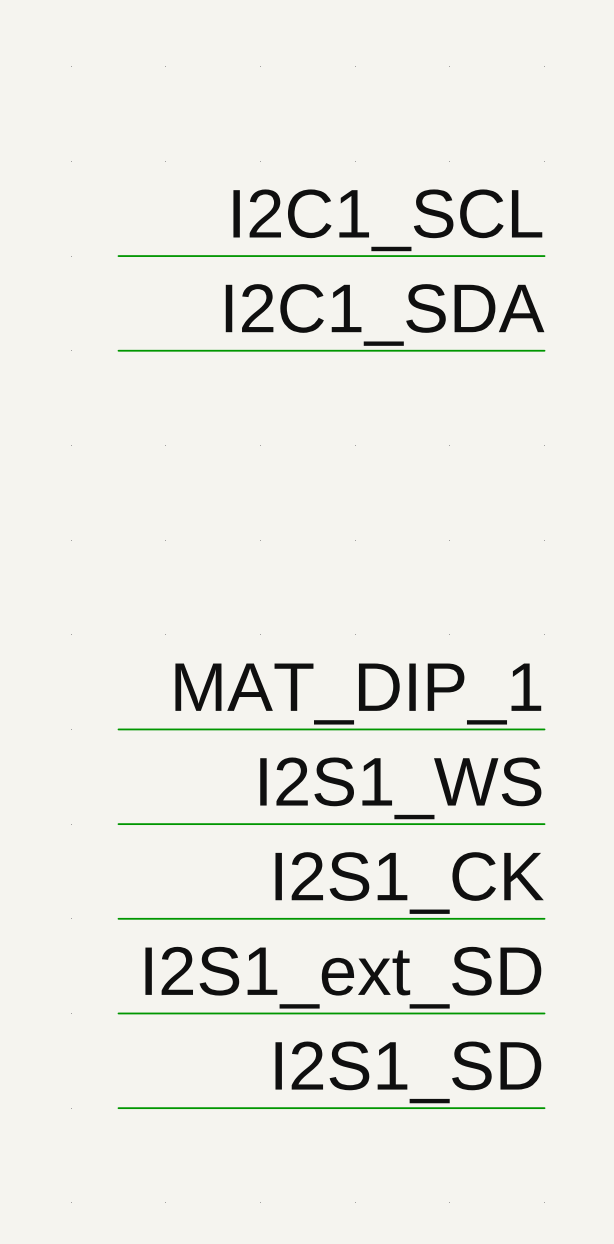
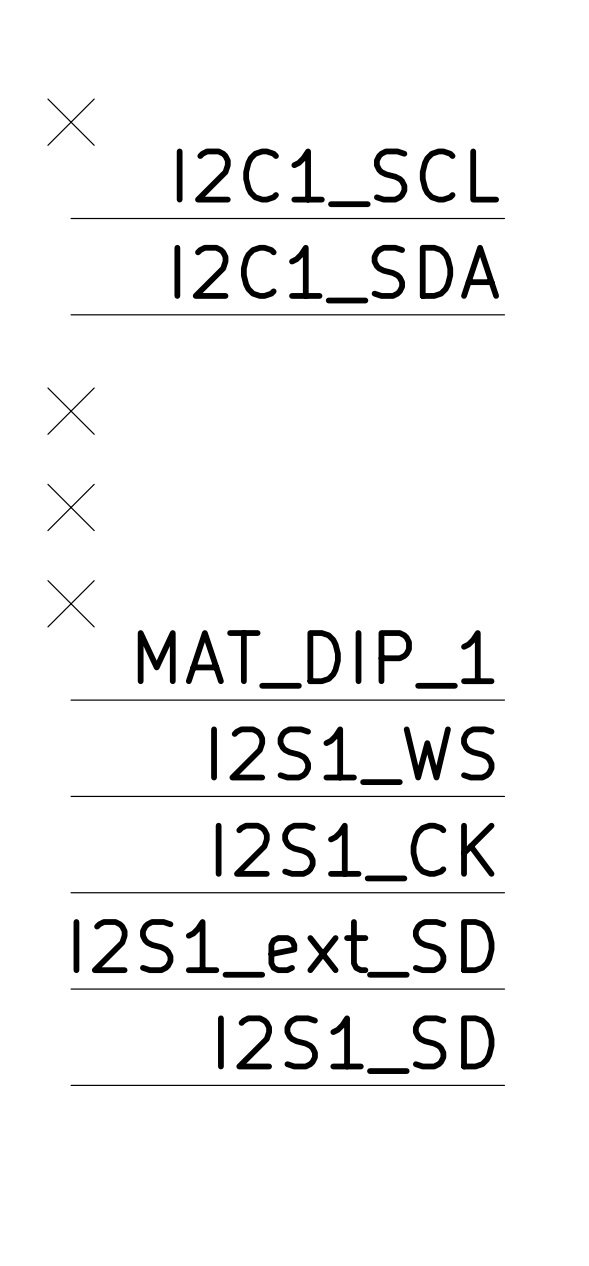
no-connect mark: none -> (71, 122)
no-connect mark: none -> (71, 411)
no-connect mark: none -> (71, 507)
no-connect mark: none -> (71, 603)

